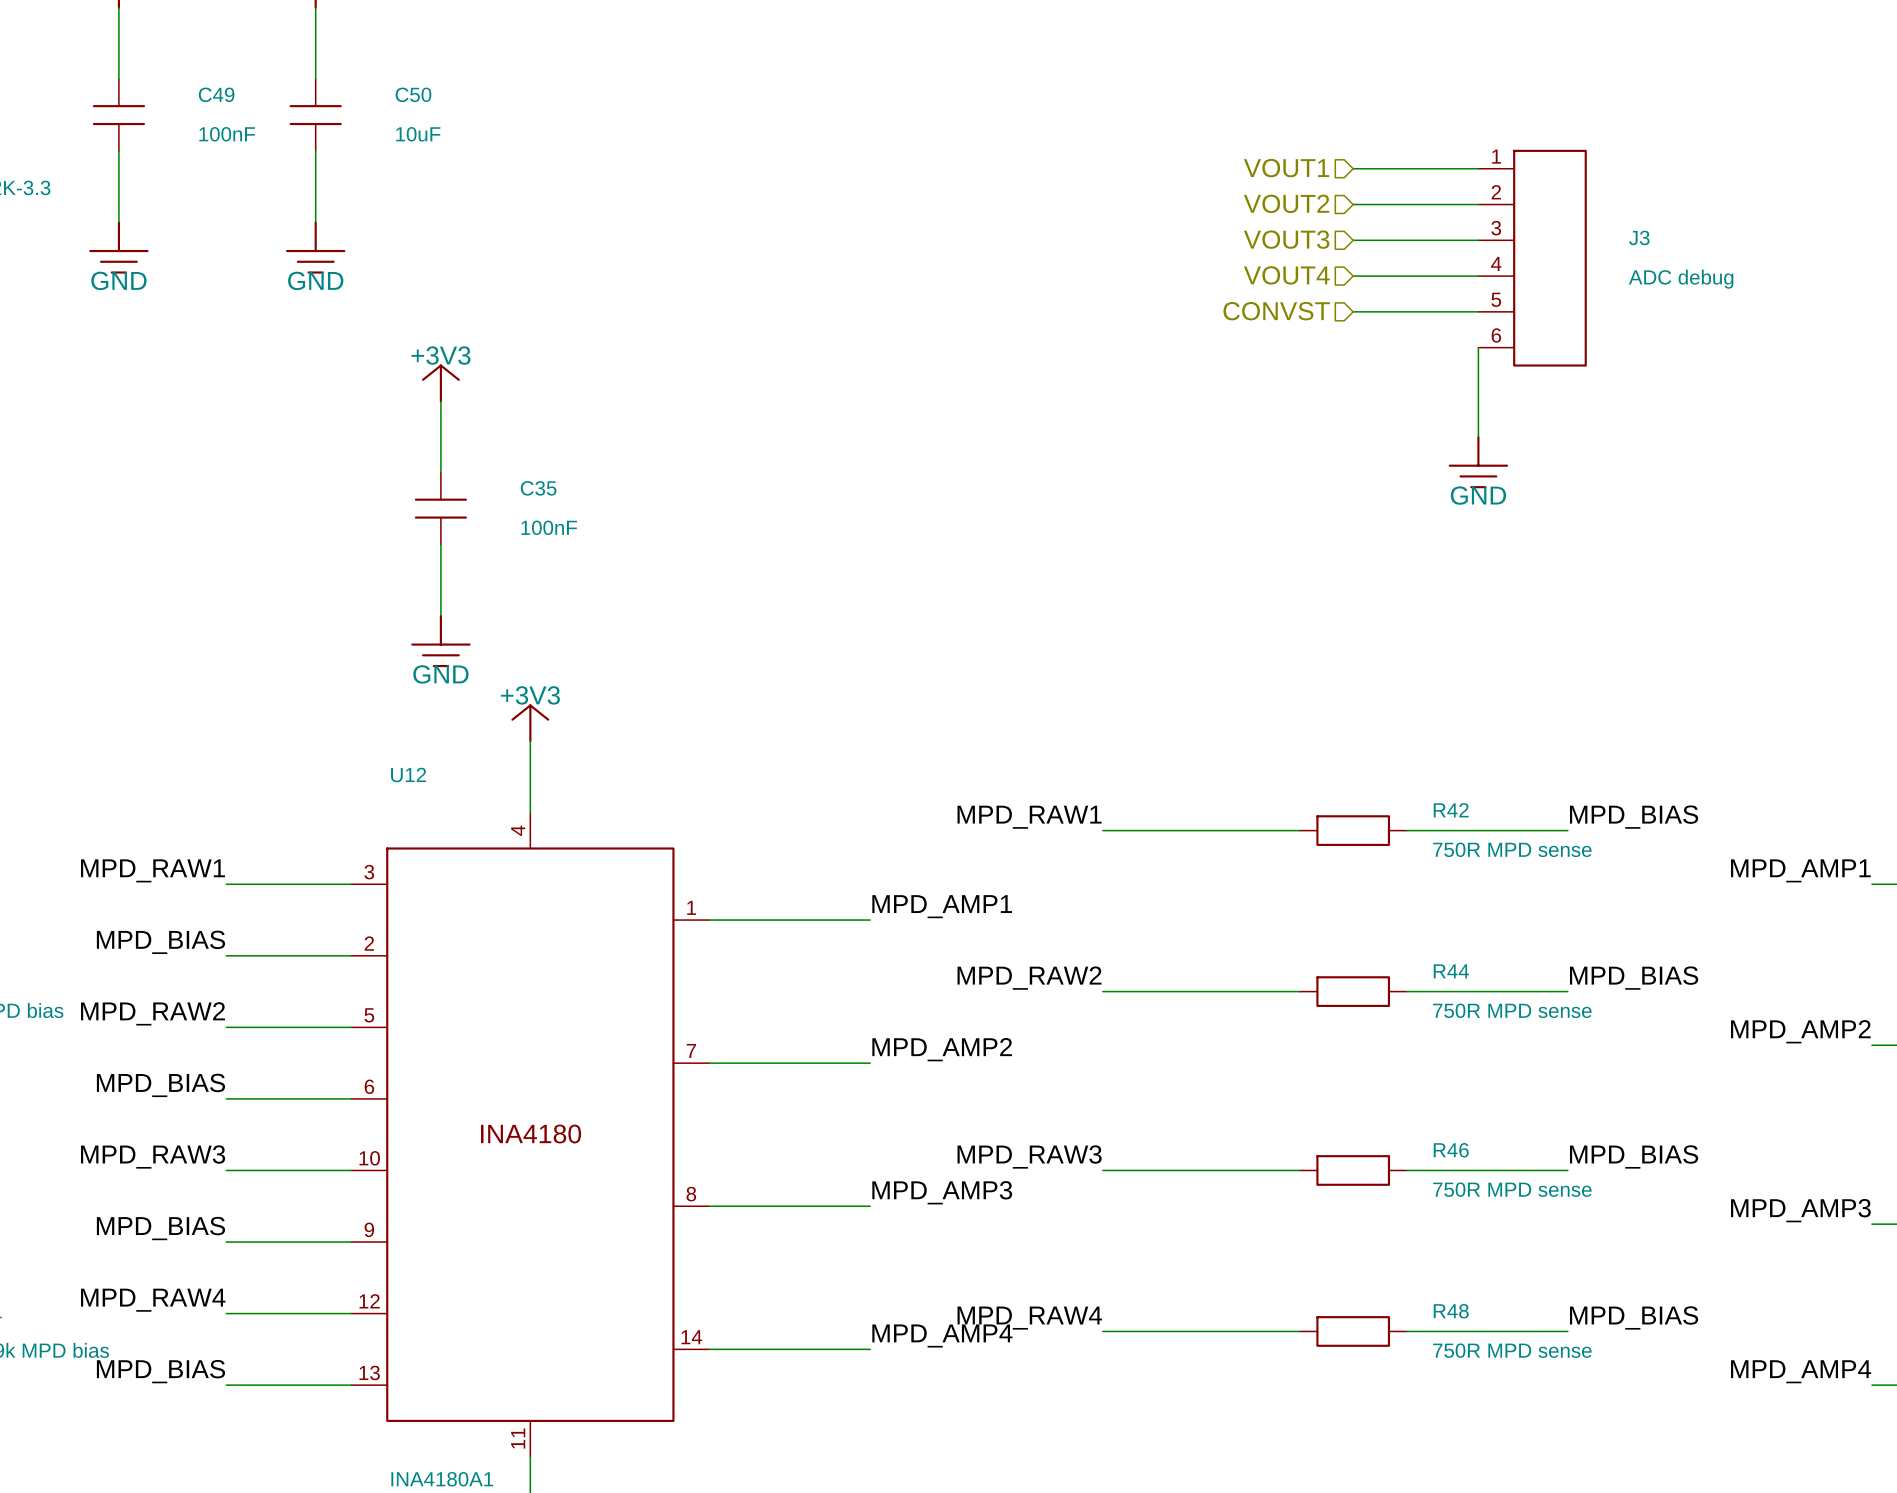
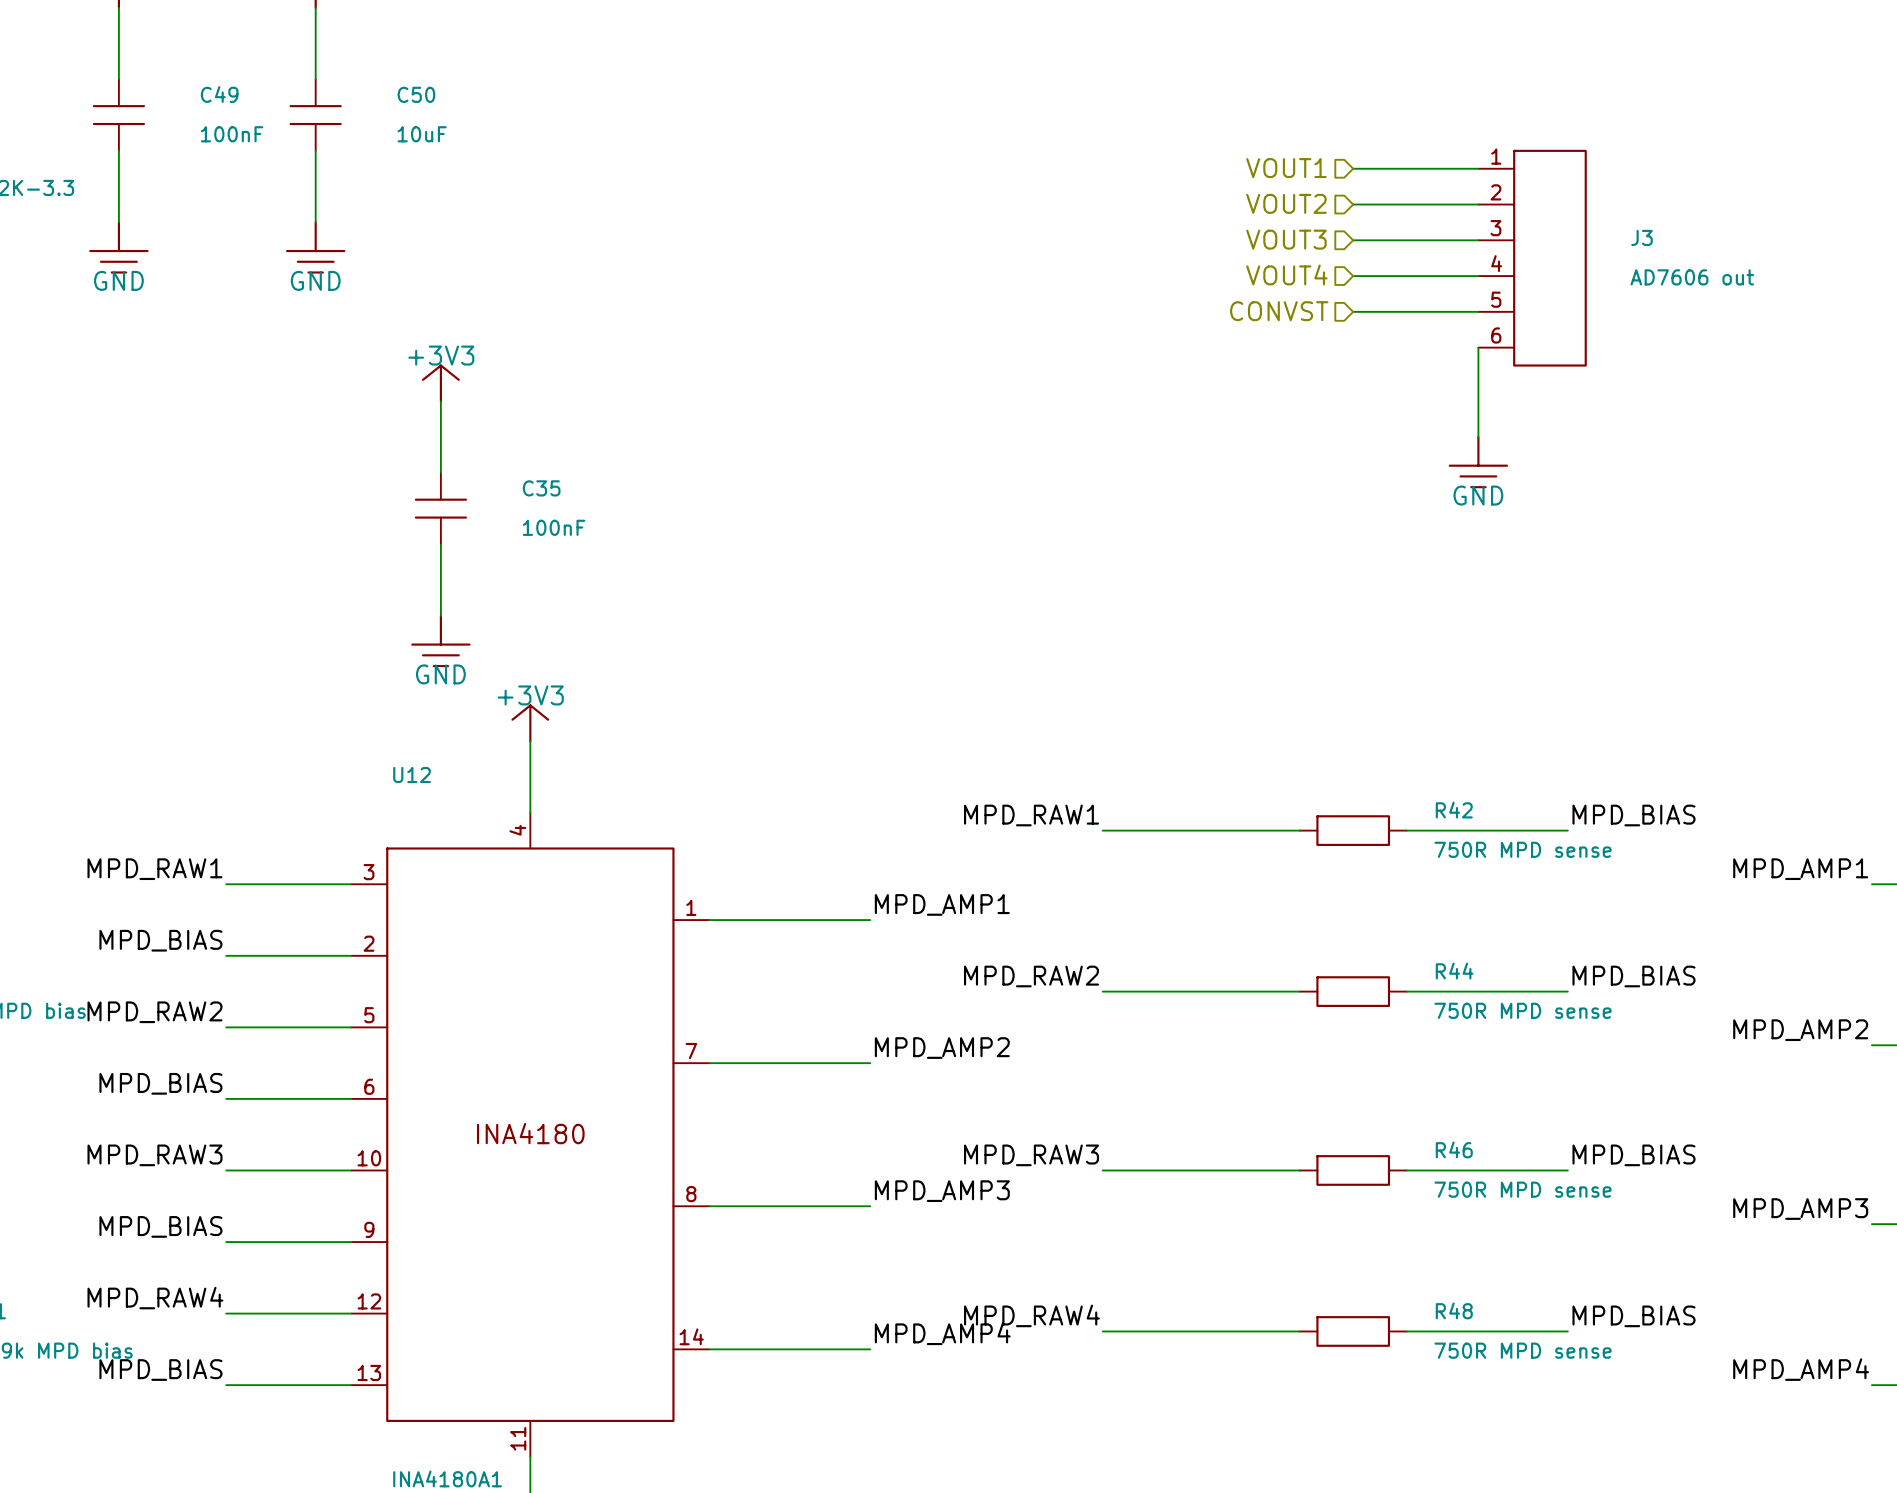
J3 value: ADC debug (1681, 279) -> AD7606 out (1692, 277)

